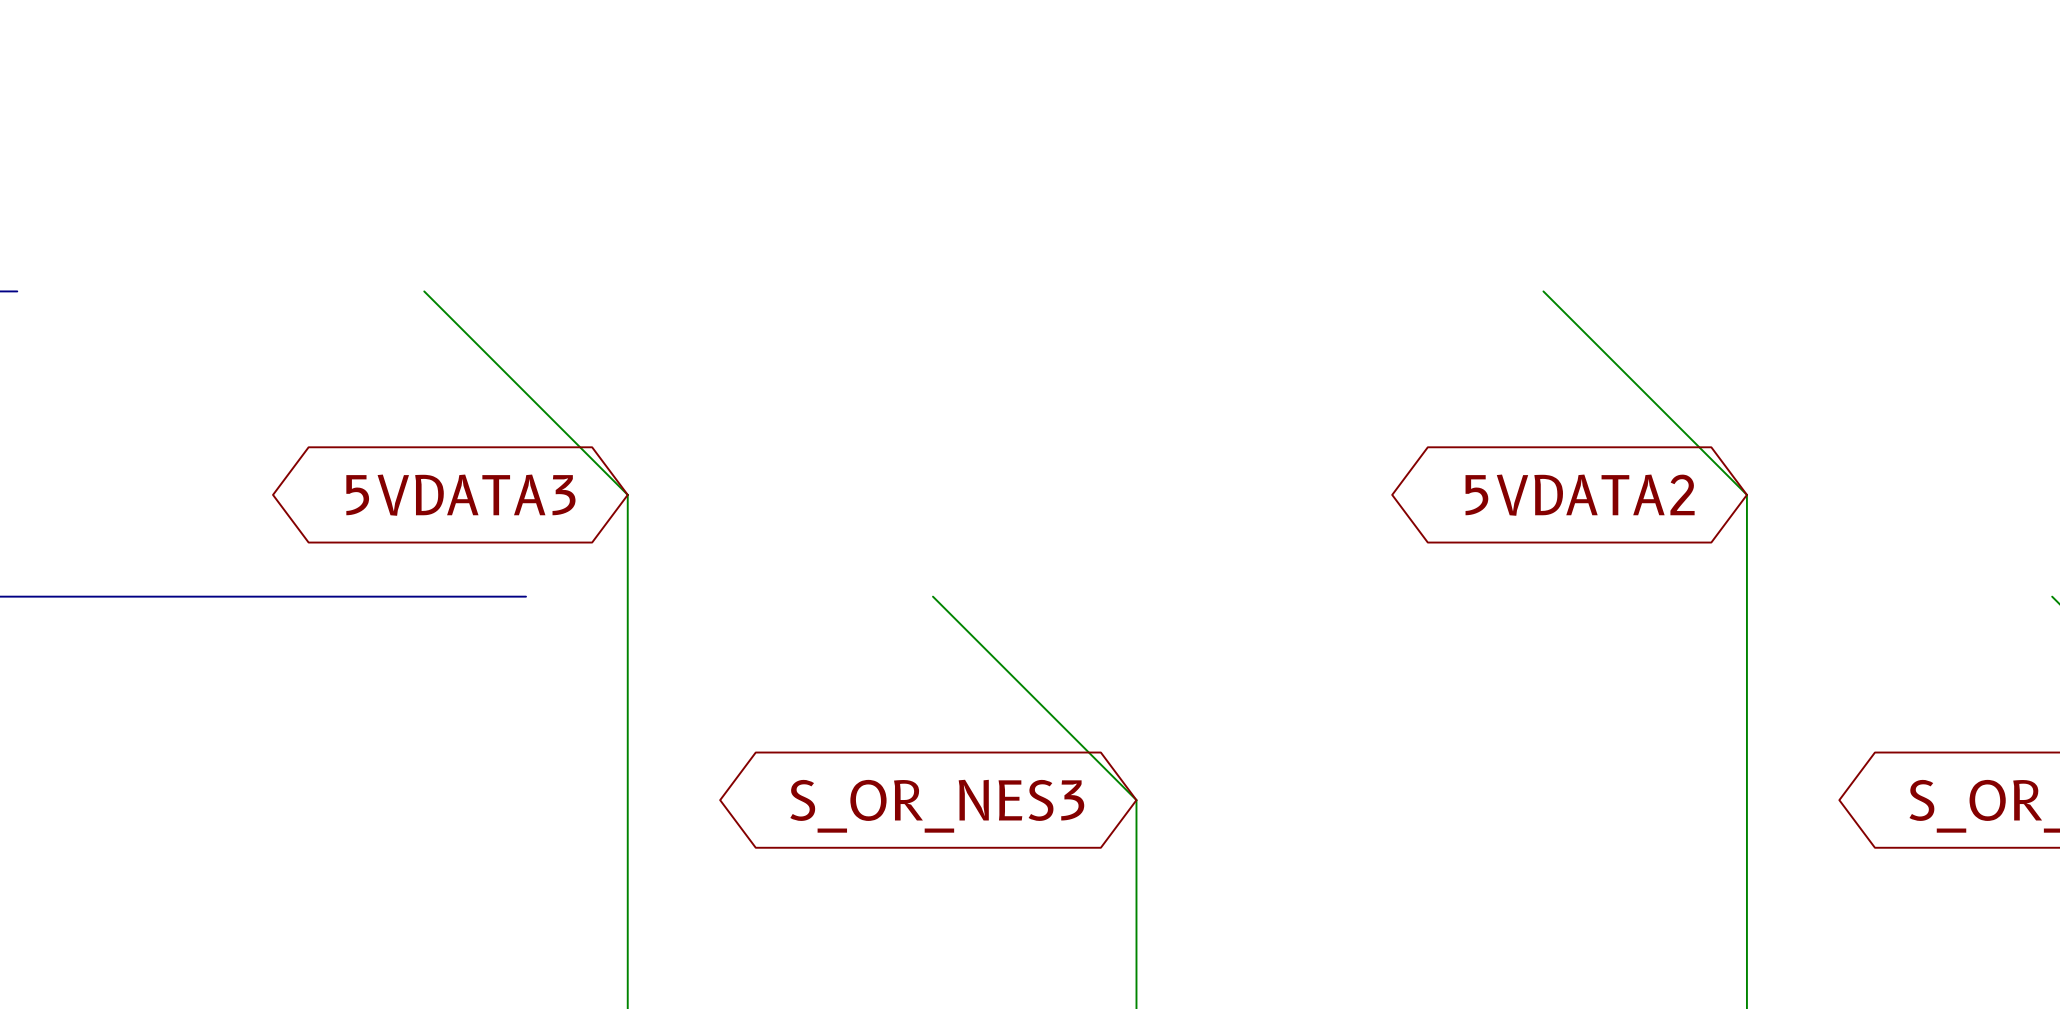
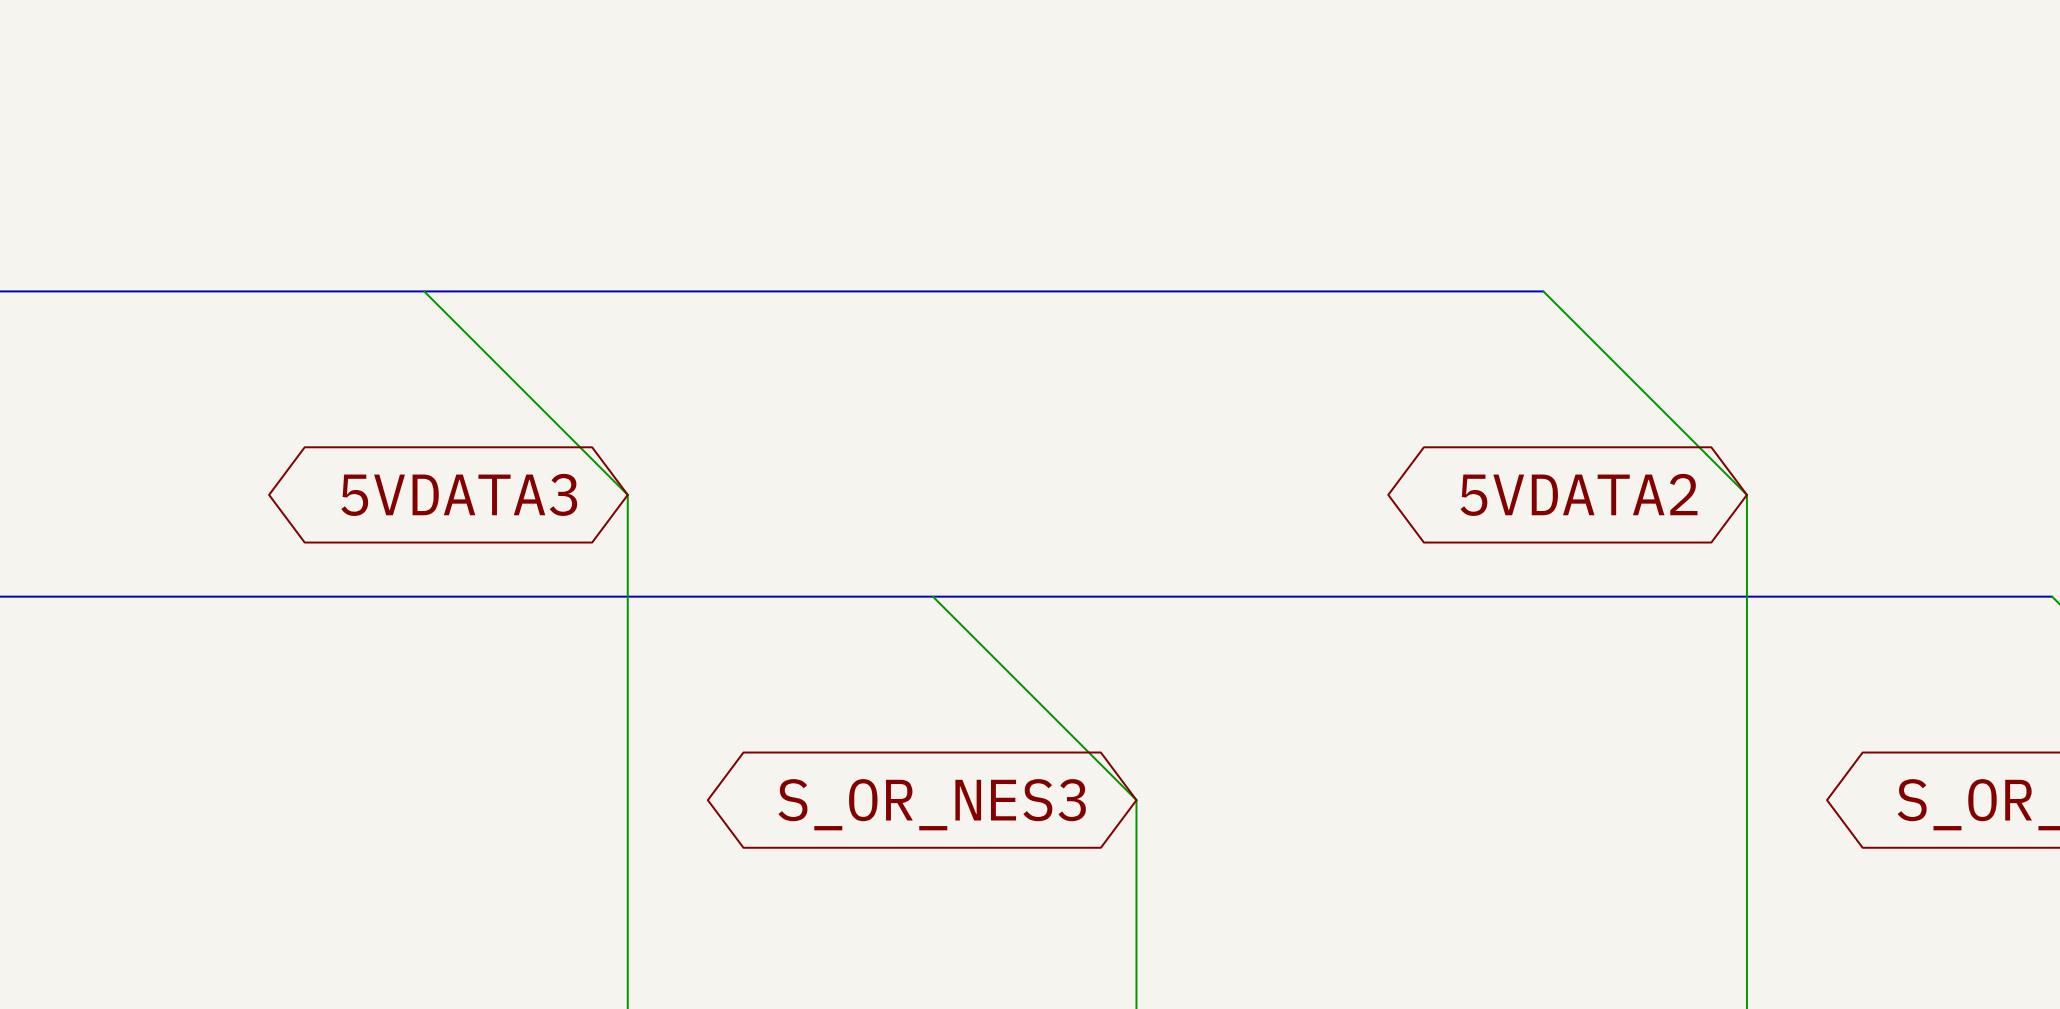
bus: none -> (17, 291) (1543, 291)
bus: none -> (526, 596) (2052, 596)

